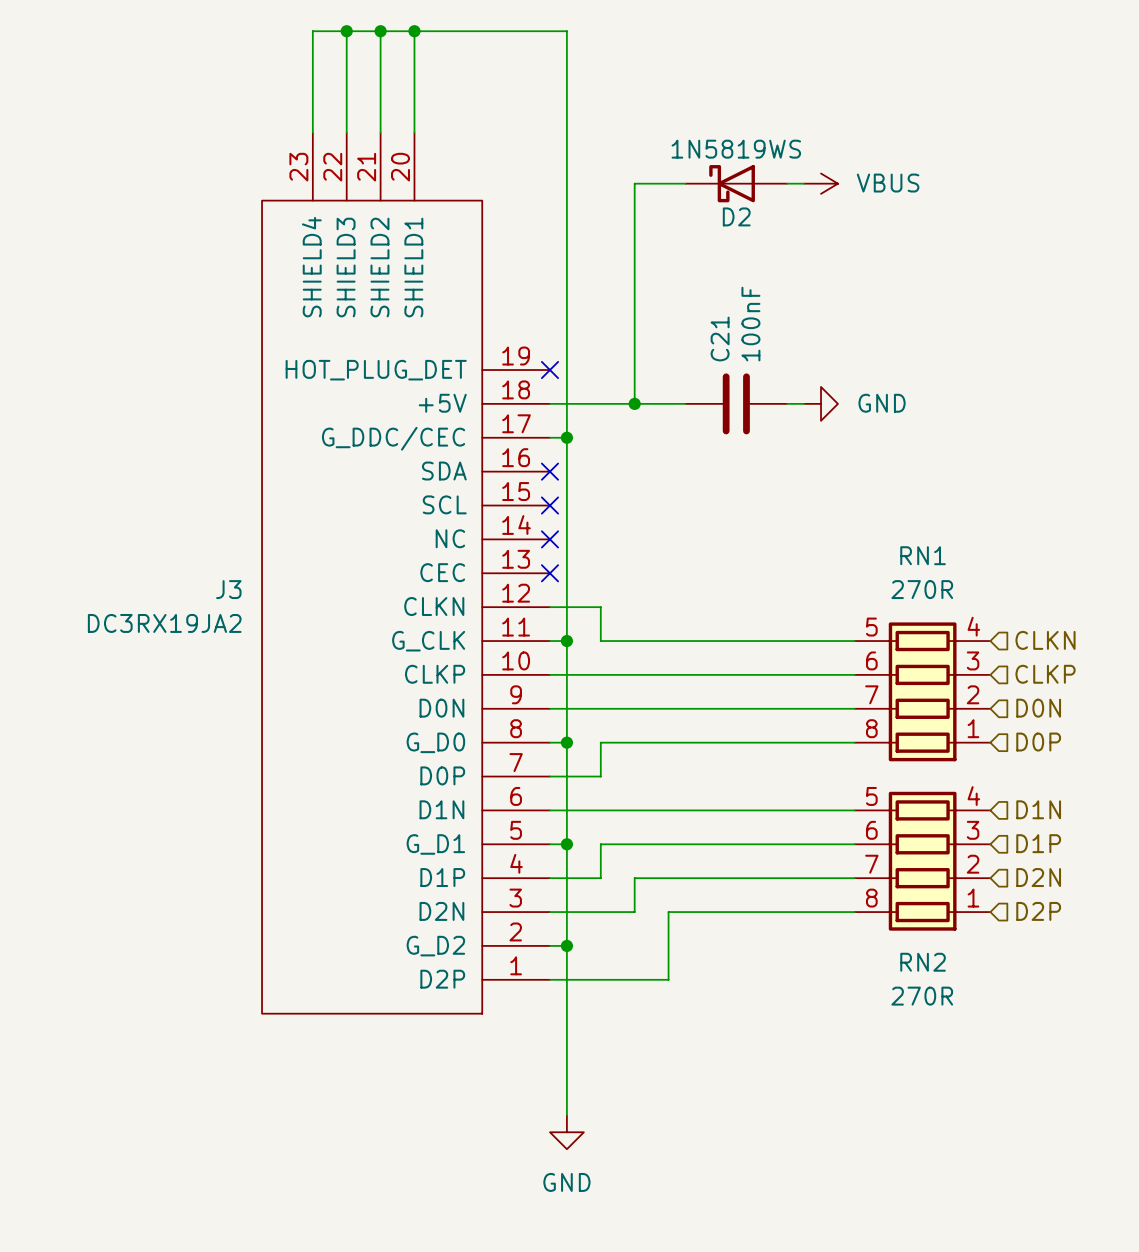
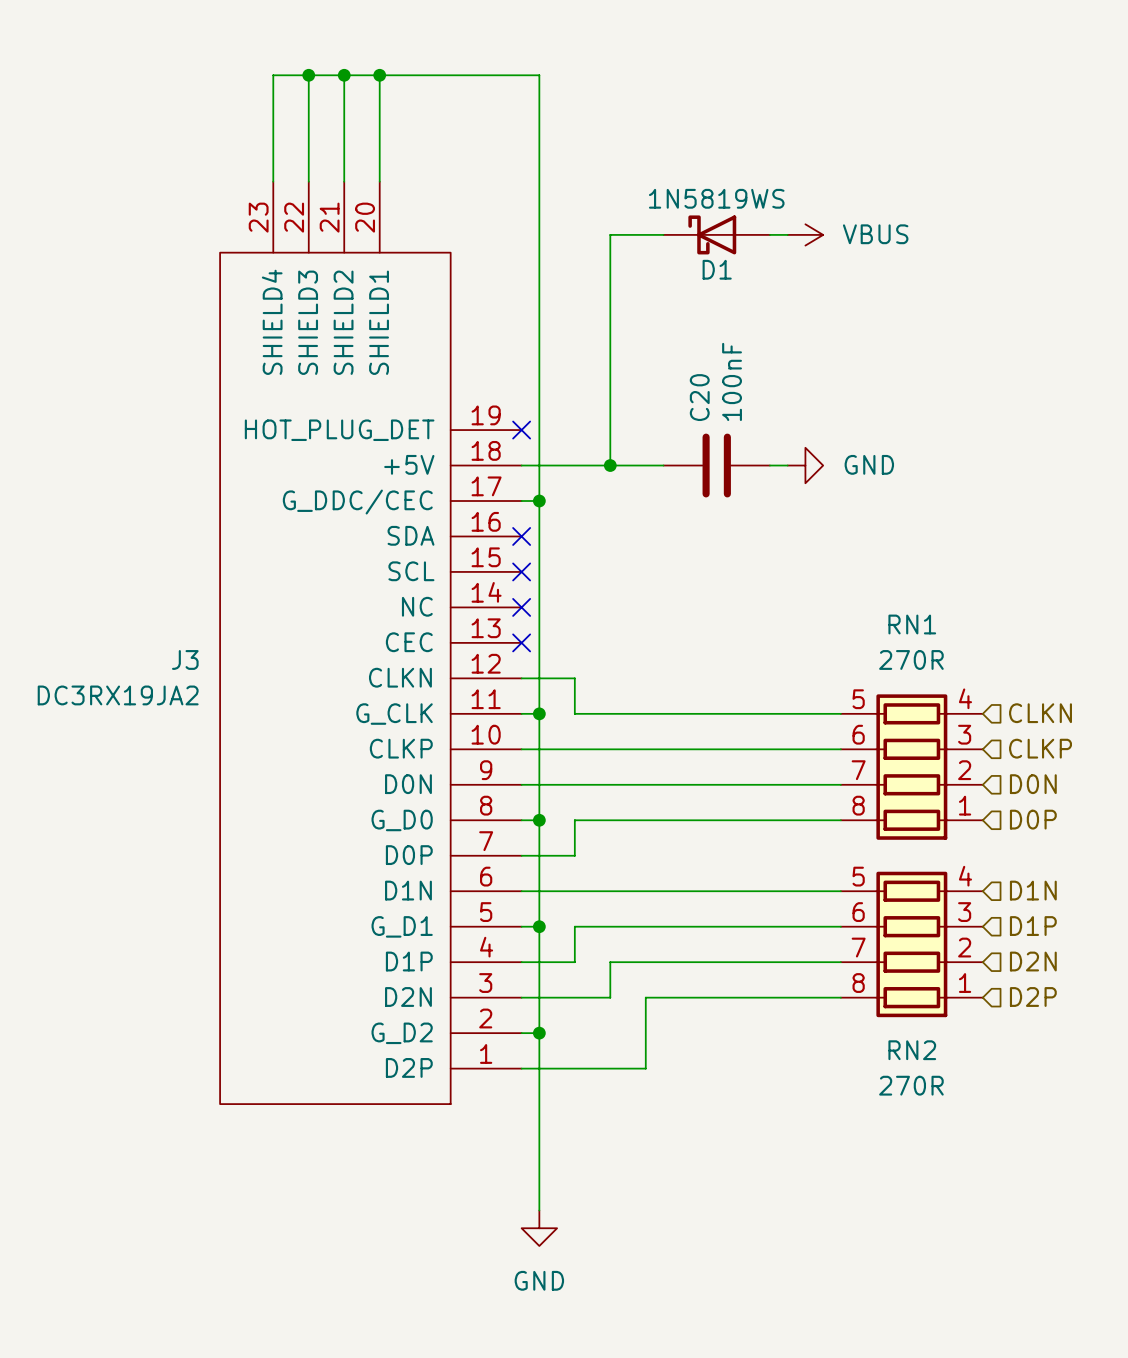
D2 name: D2 (736, 216) -> D1 (717, 269)
C21 name: C21 (720, 338) -> C20 (699, 397)

